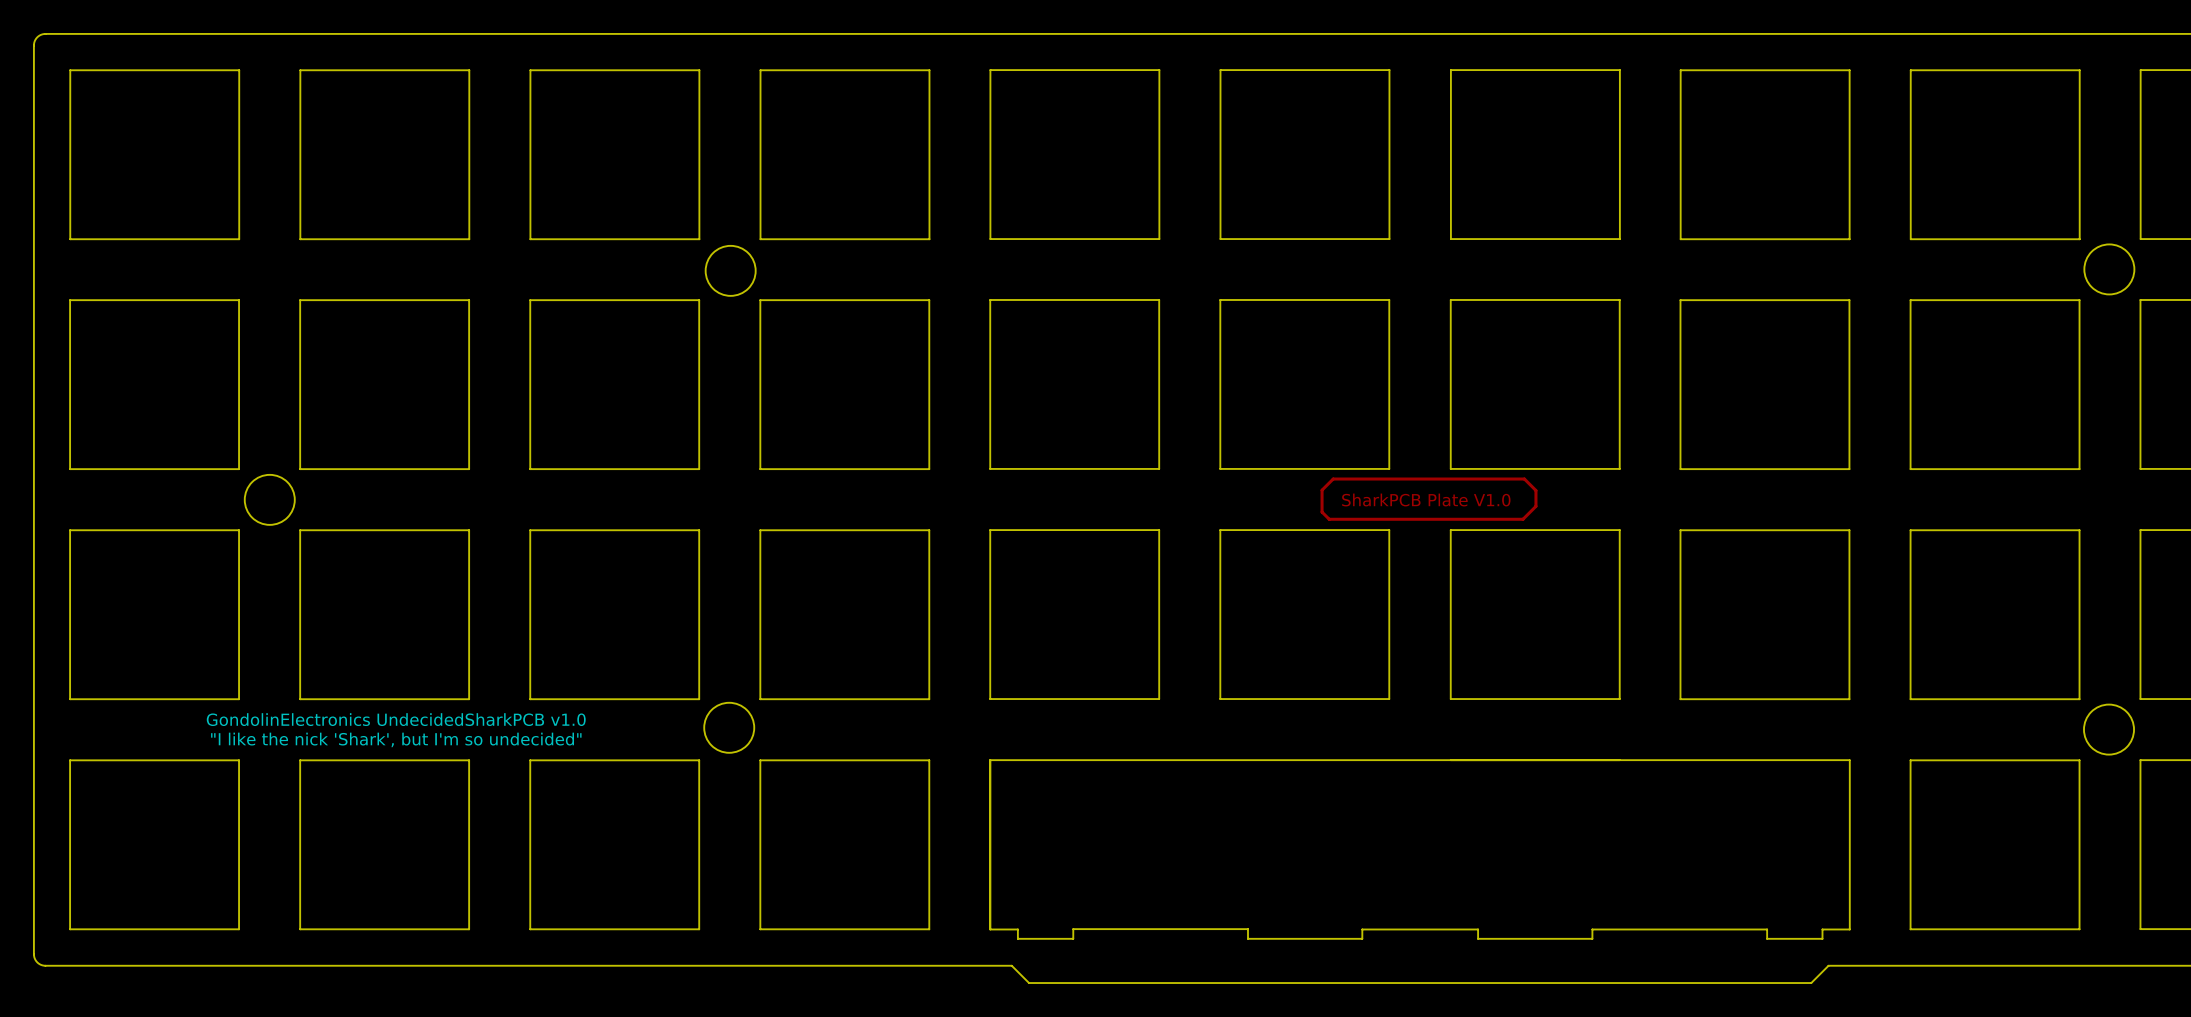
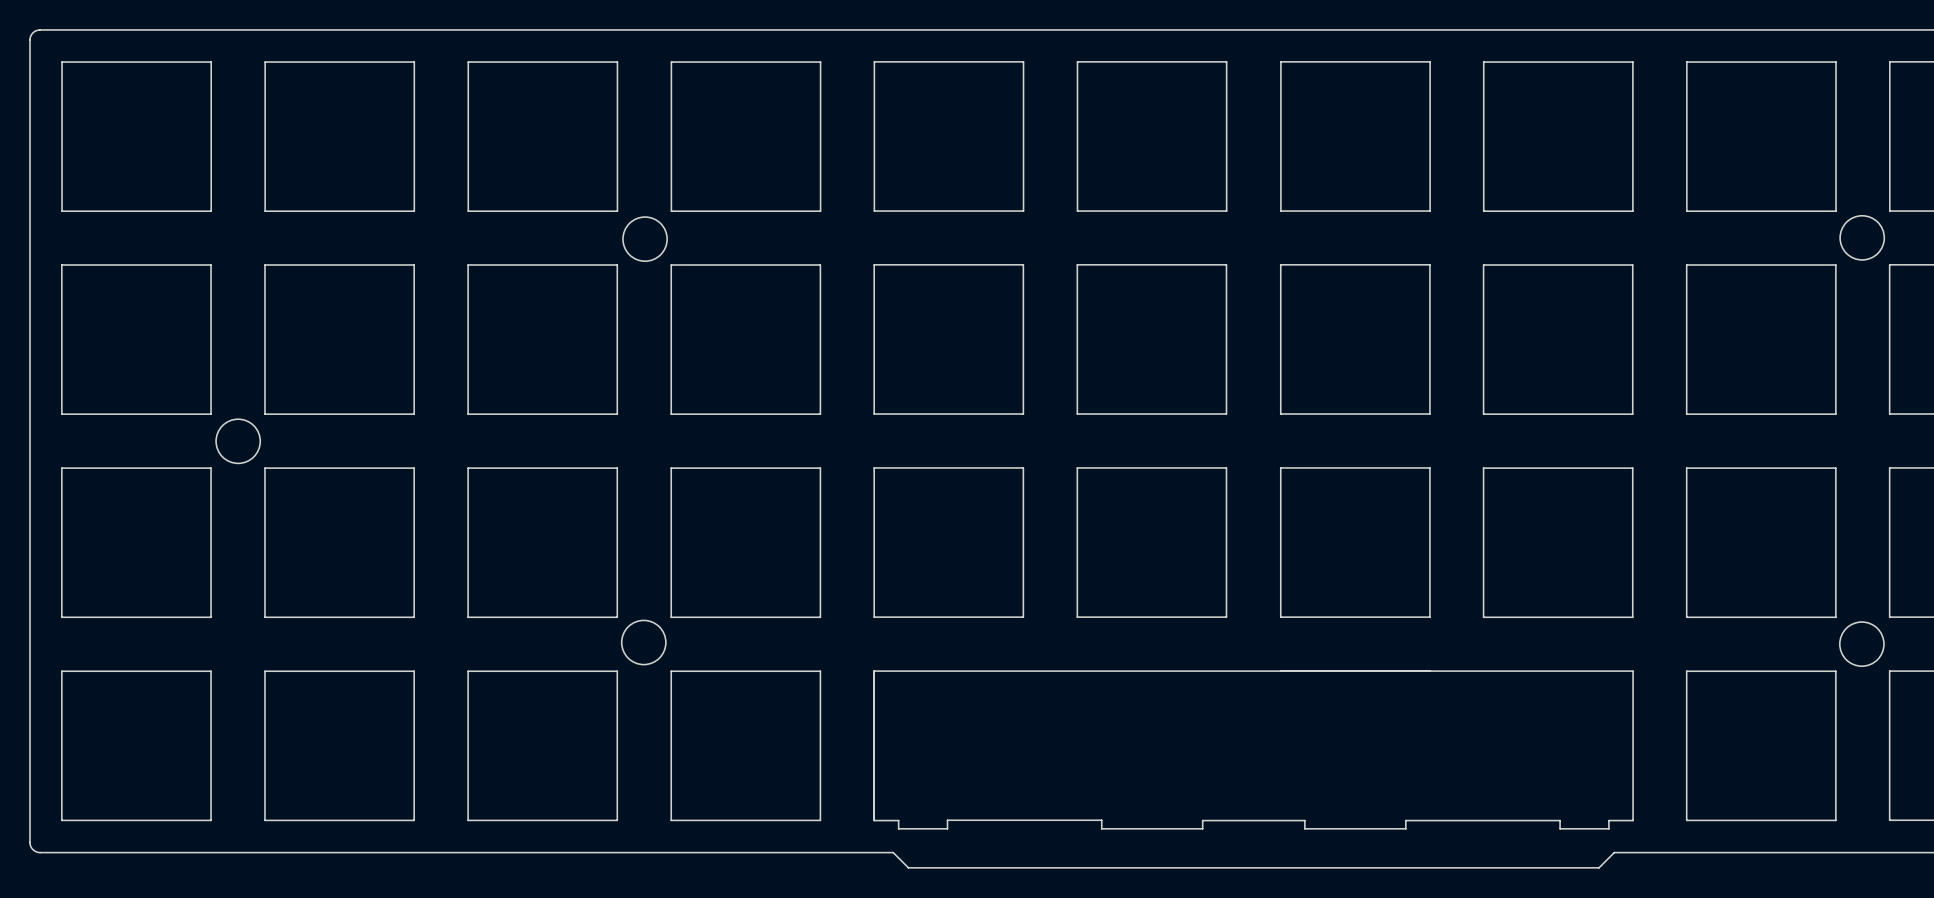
track: (1333, 479) (1524, 479) (1535, 490) (1535, 506) (1523, 519) (1329, 519) (1322, 512) (1322, 490) (1333, 479) -> none
text: SharkPCB Plate V1.0 (1426, 500) -> none
text: GondolinElectronics UndecidedSharkPCB v1.0 (396, 719) -> none
text: "I like the nick 'Shark', but I'm so undecided" (396, 739) -> none

